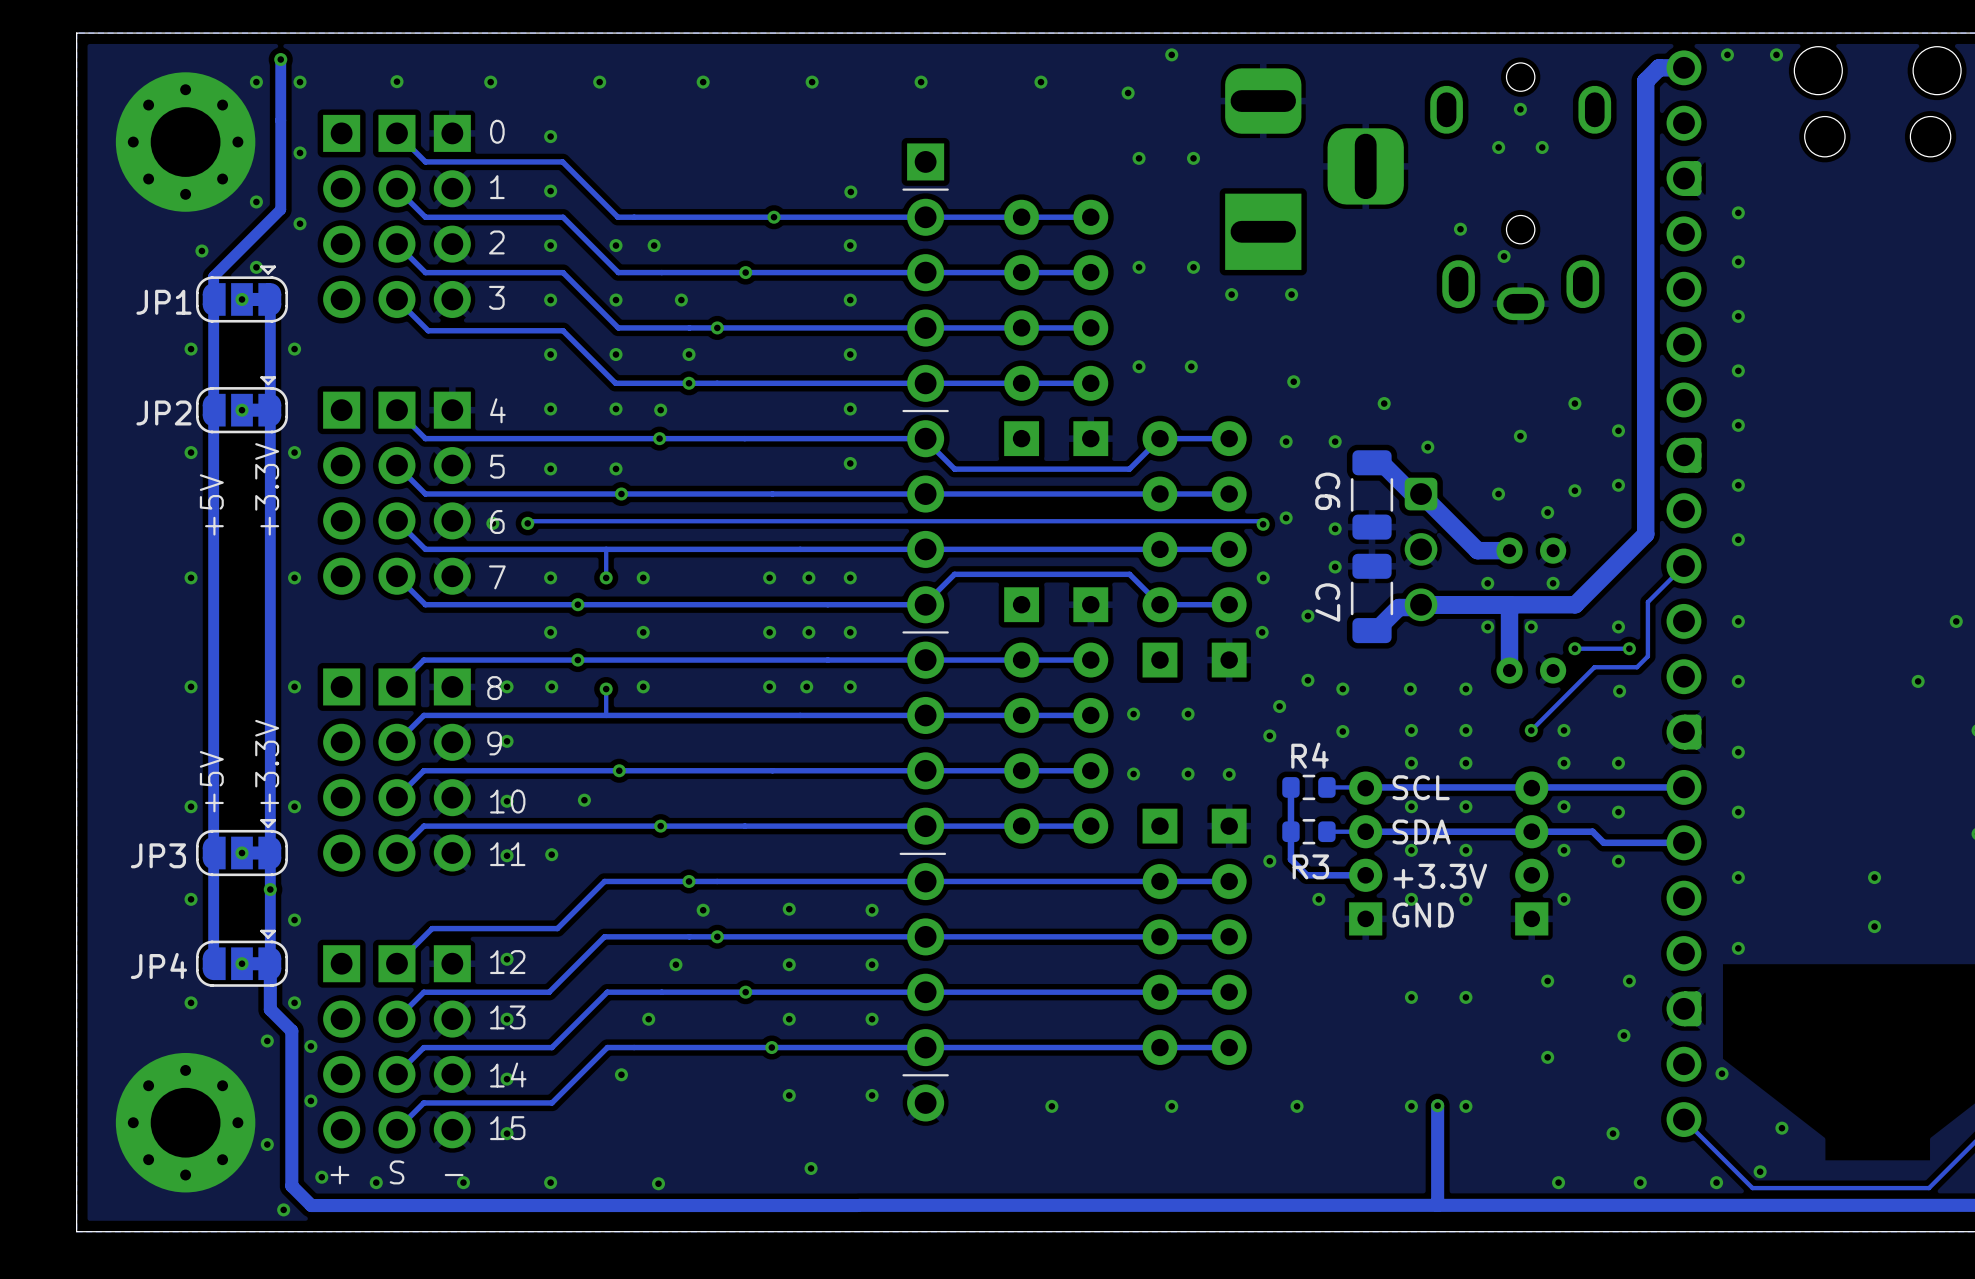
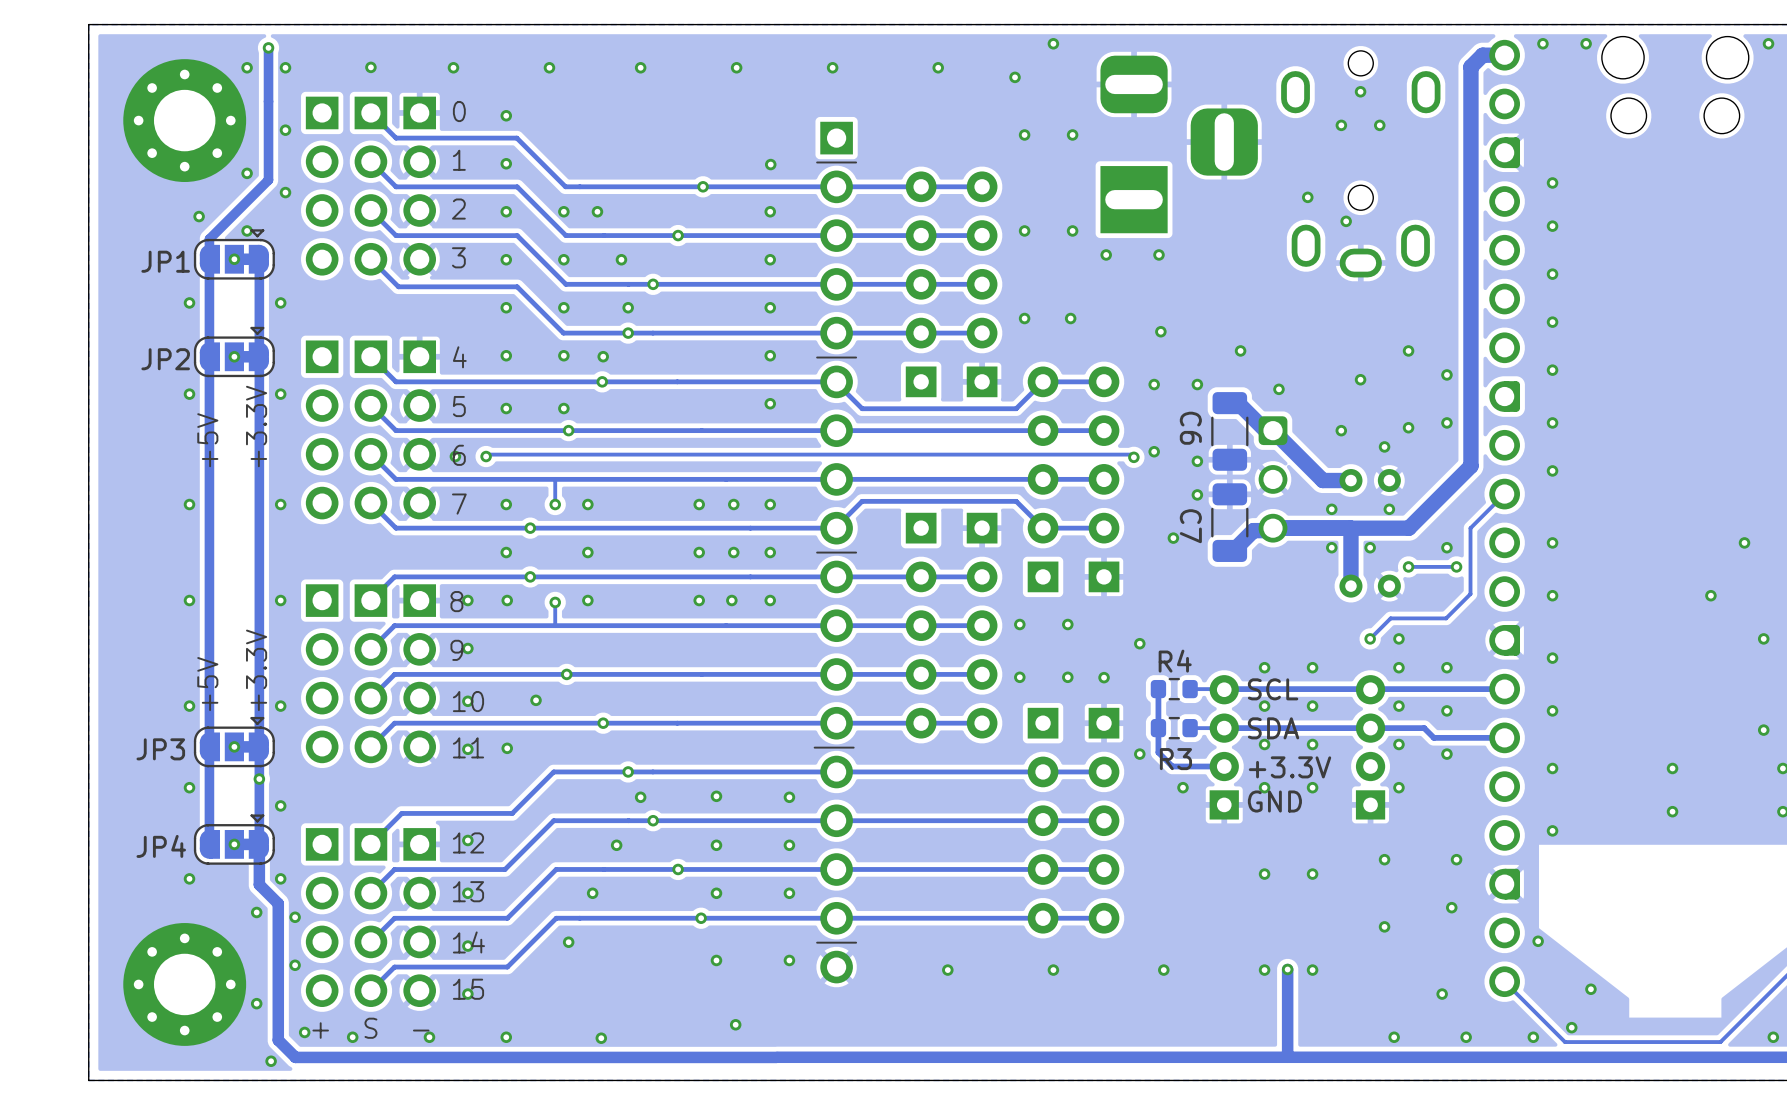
via: (1263, 577) -> none
track: (1647, 602) (1647, 656) (1637, 667) (1594, 667) (1554, 707) -> (1472, 525) (1470, 528) (1470, 594) (1446, 618) (1390, 618)
via: (1262, 632) -> none
via: (1307, 680) -> none
via: (1342, 689) -> none
via: (1410, 689) -> none
via: (1465, 689) -> none
via: (1619, 691) -> none
via: (1279, 706) -> none
via: (1411, 730) -> none
via: (1465, 730) -> none
via: (1342, 731) -> none

